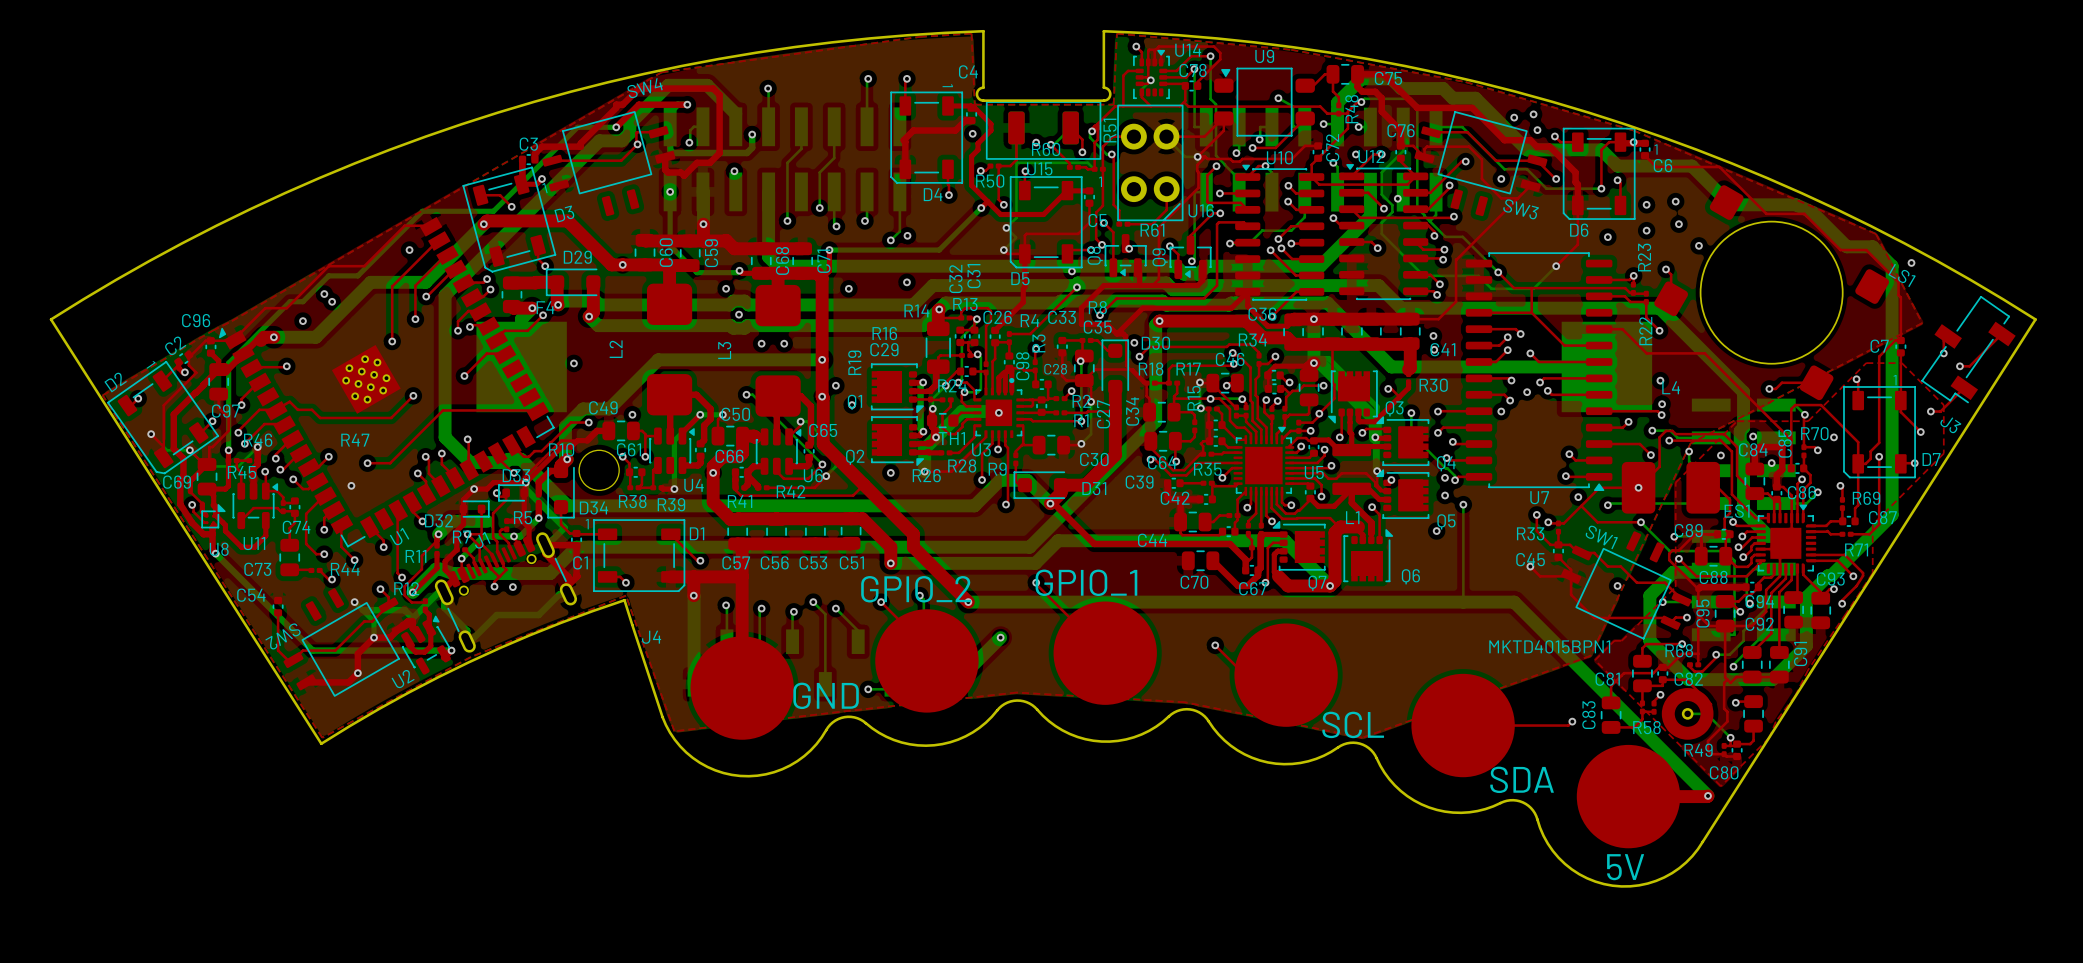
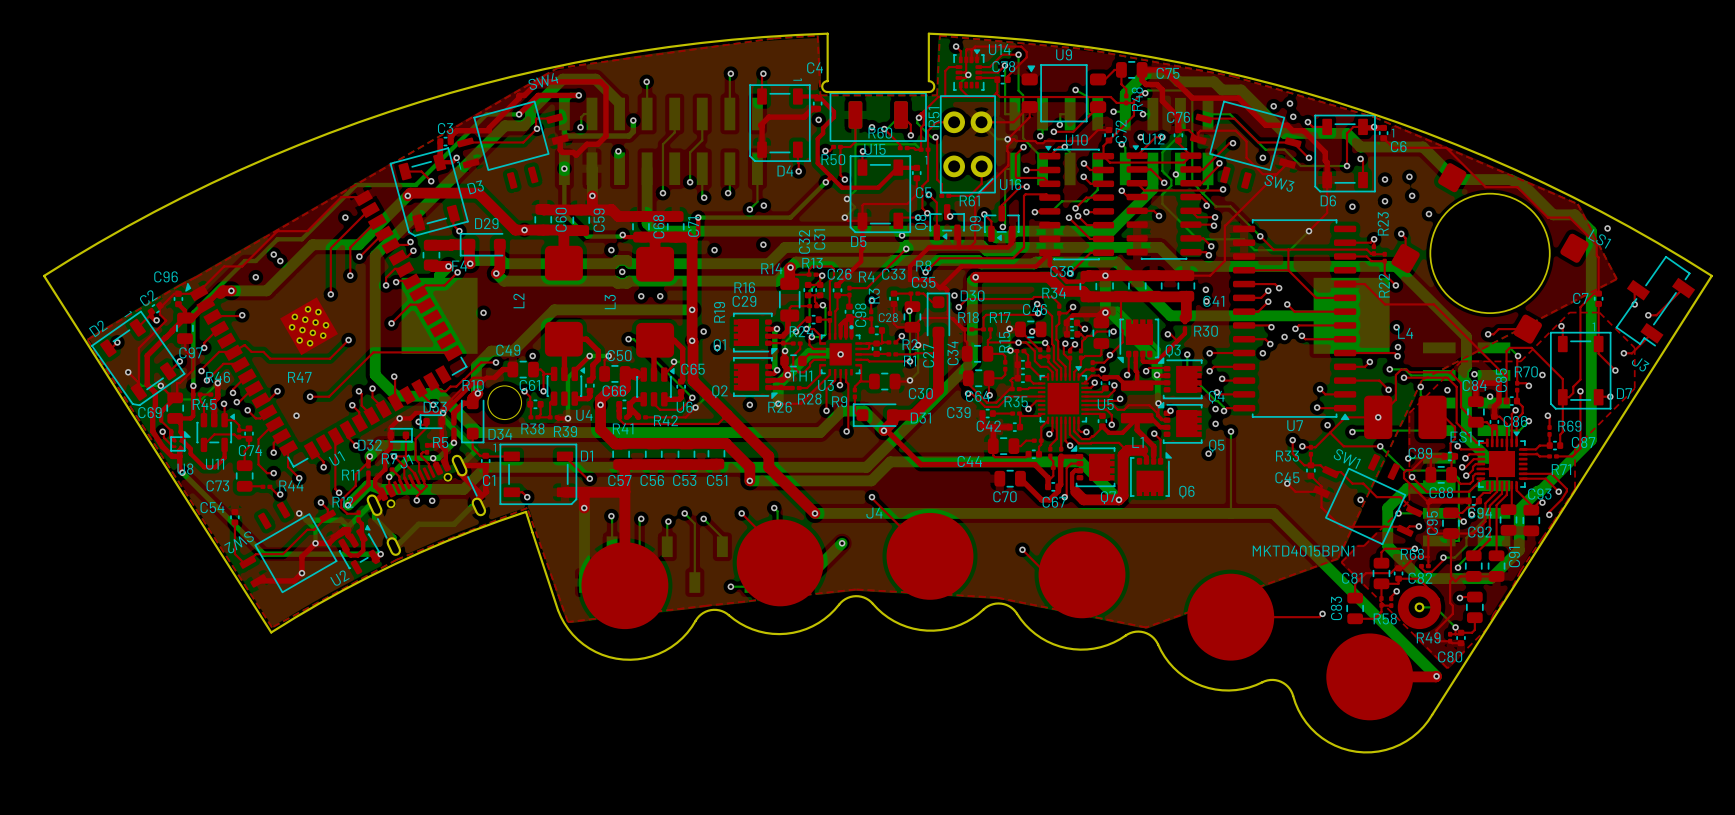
text: GPIO_1 (1086, 582) -> none
text: GPIO_2 (916, 589) -> none
J4 name position: J4 (651, 637) -> J4 (874, 513)
text: GND (826, 695) -> none
text: SCL (1353, 724) -> none
text: SDA (1522, 779) -> none
text: 5V (1625, 867) -> none

